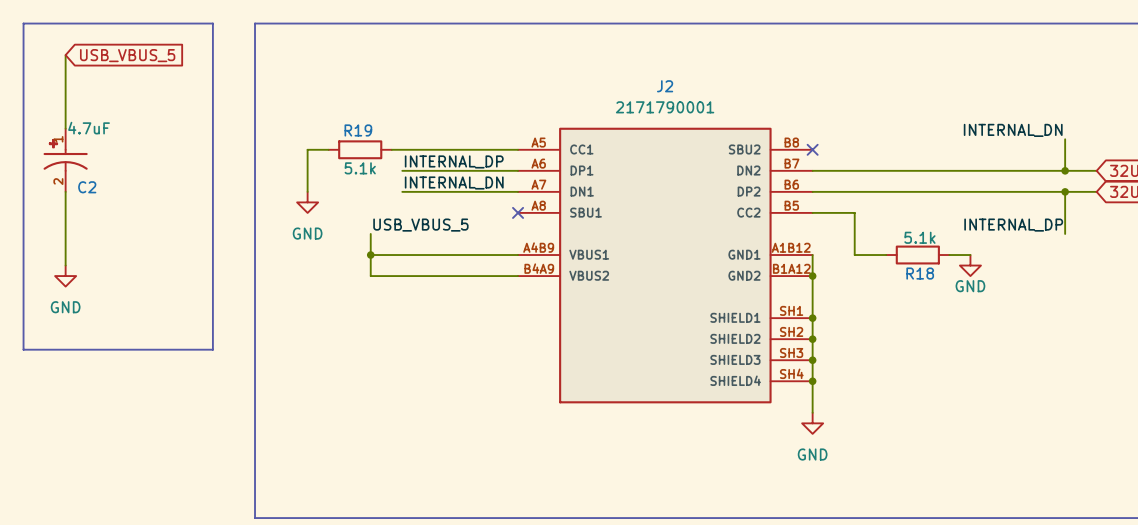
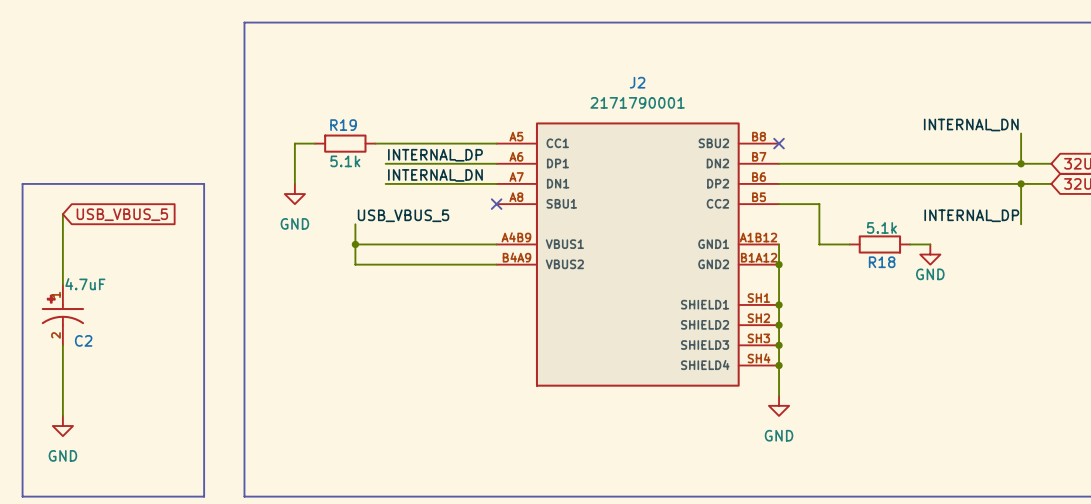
wire: (65, 55) (65, 128) -> none
global label position: USB_VBUS_5 (127, 55) -> USB_VBUS_5 (122, 214)
C2 position: (65, 160) -> (62, 315)
line: (23, 191) (23, 23) (212, 23) (212, 191) -> (22, 183) (204, 183)
wire: (65, 191) (65, 223) -> (62, 254) (62, 284)
power symbol position: GND (65, 276) -> GND (62, 426)
line: (23, 349) (212, 349) -> (22, 335) (22, 496) (204, 496) (204, 335)
wire: none -> (62, 345) (62, 415)

